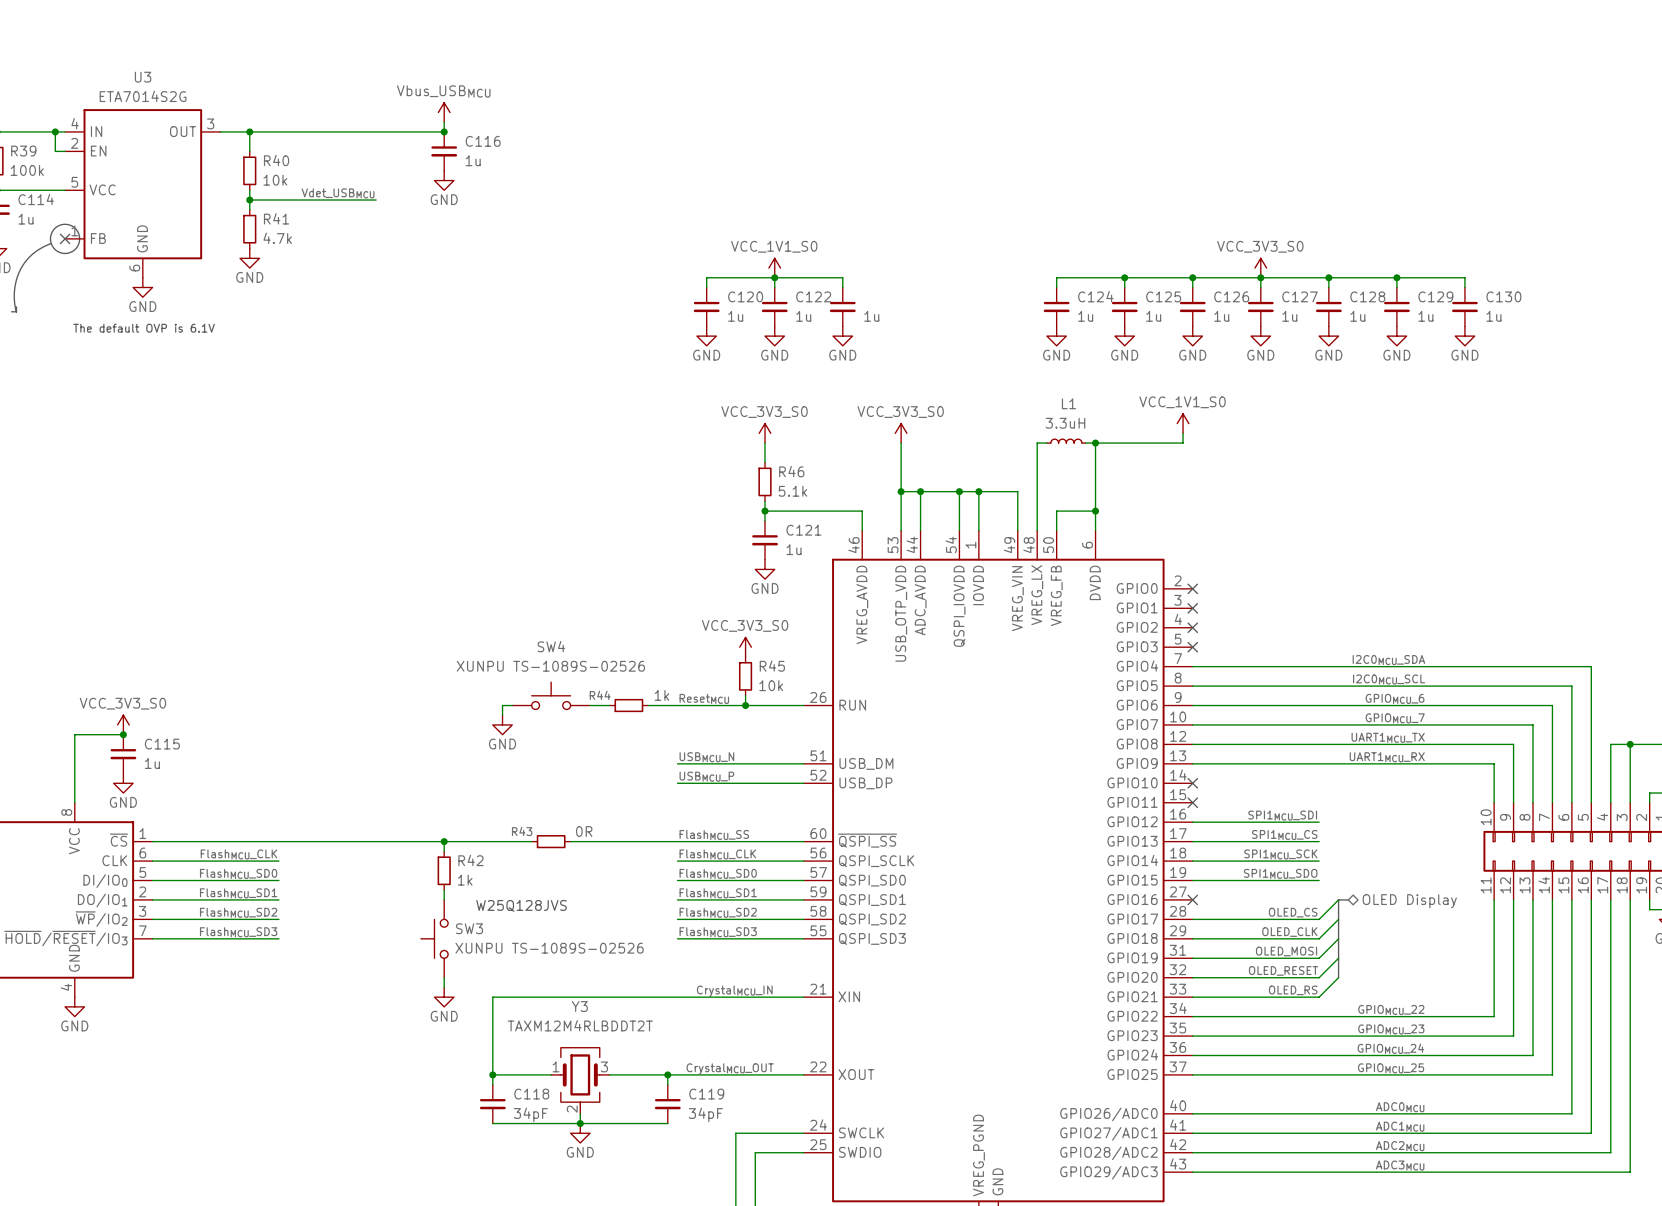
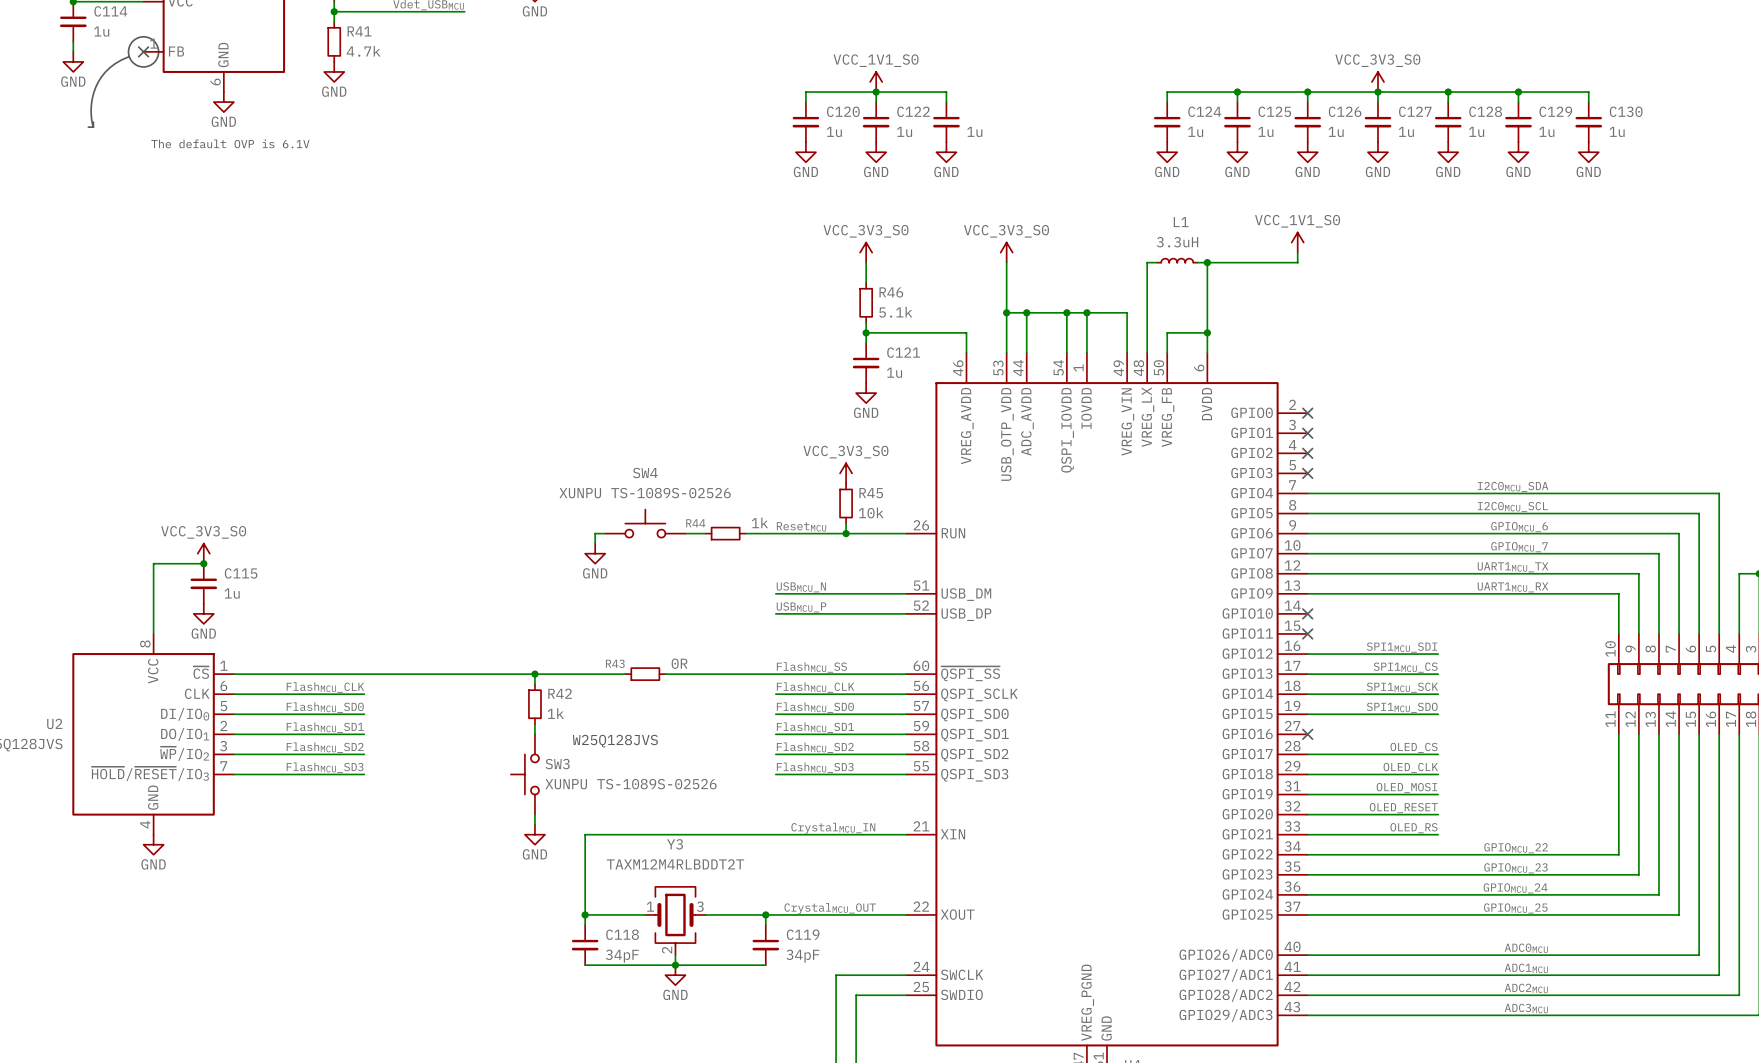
wire: (1338, 899) (1319, 919) -> none
bus: (1348, 899) (1338, 899) (1338, 977) -> none
hierarchical label: OLED Display (1409, 901) -> none
wire: (1338, 919) (1319, 938) -> none
wire: (1338, 938) (1319, 958) -> none
wire: (1338, 958) (1319, 977) -> none
wire: (1338, 977) (1319, 997) -> none

